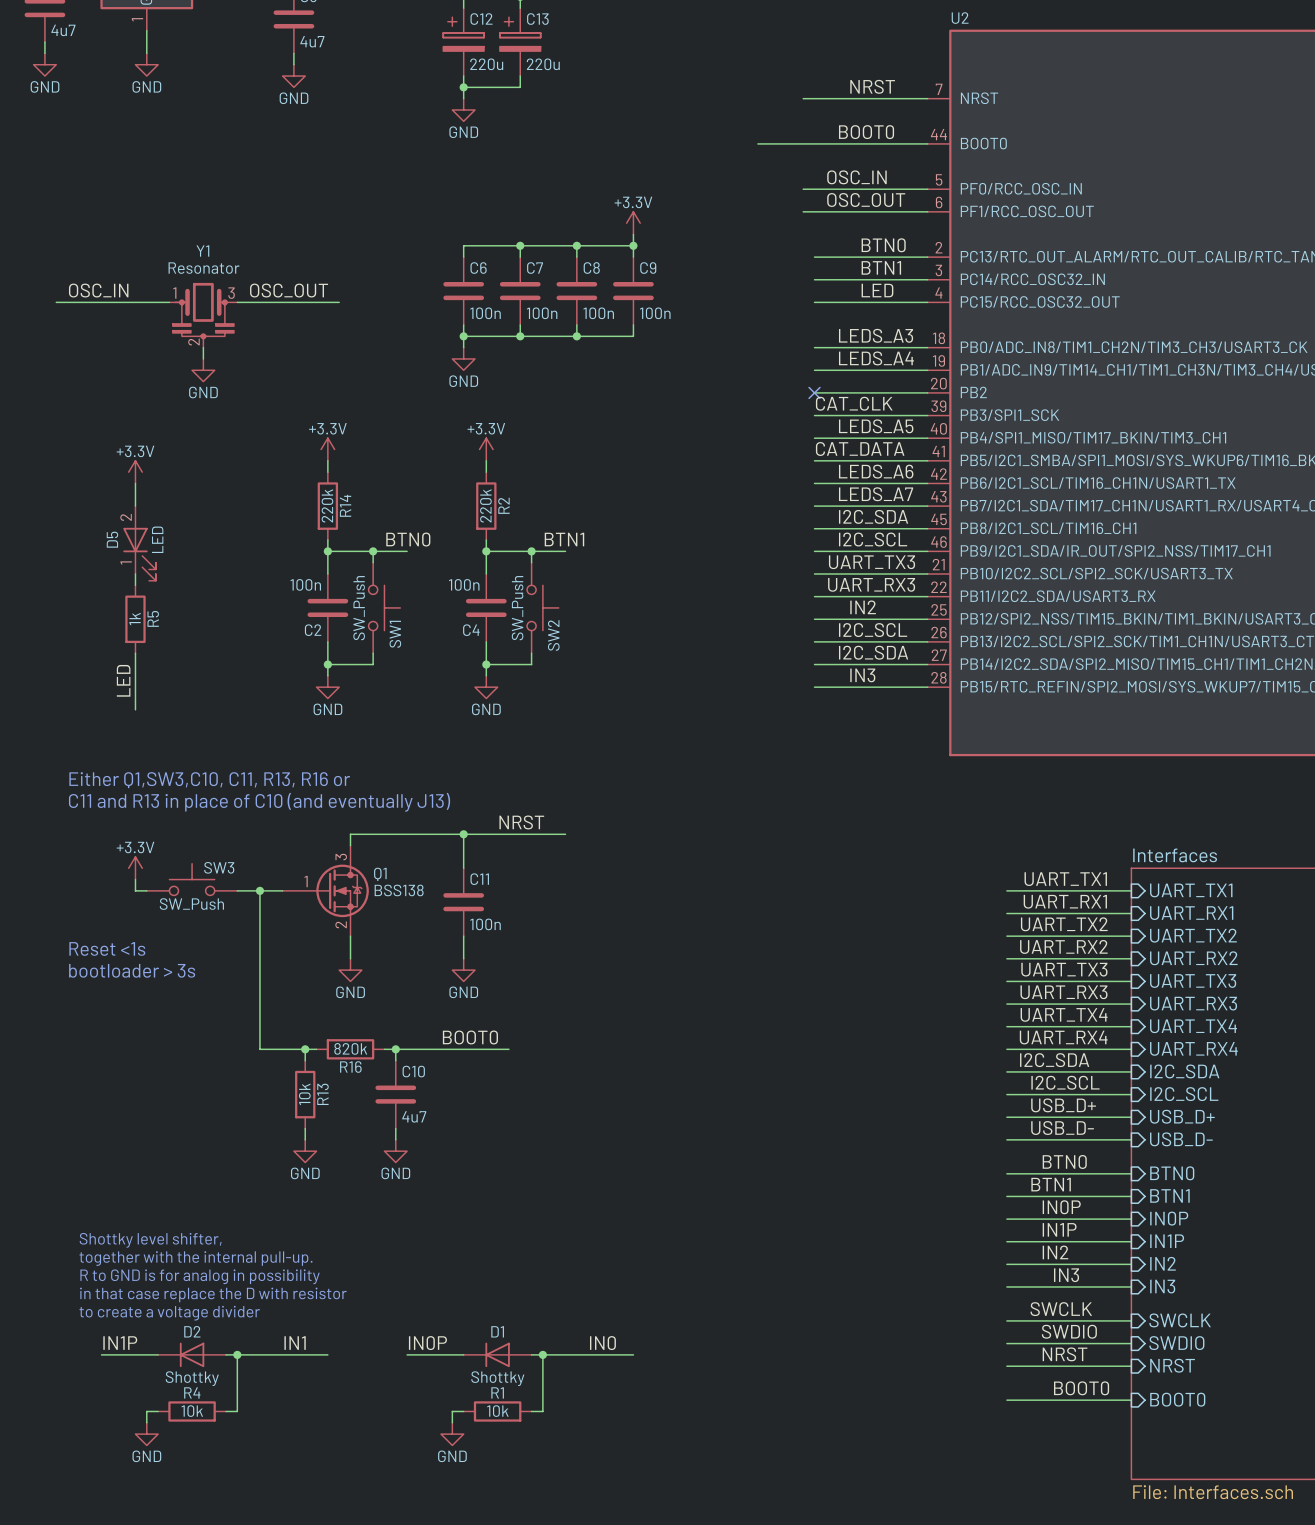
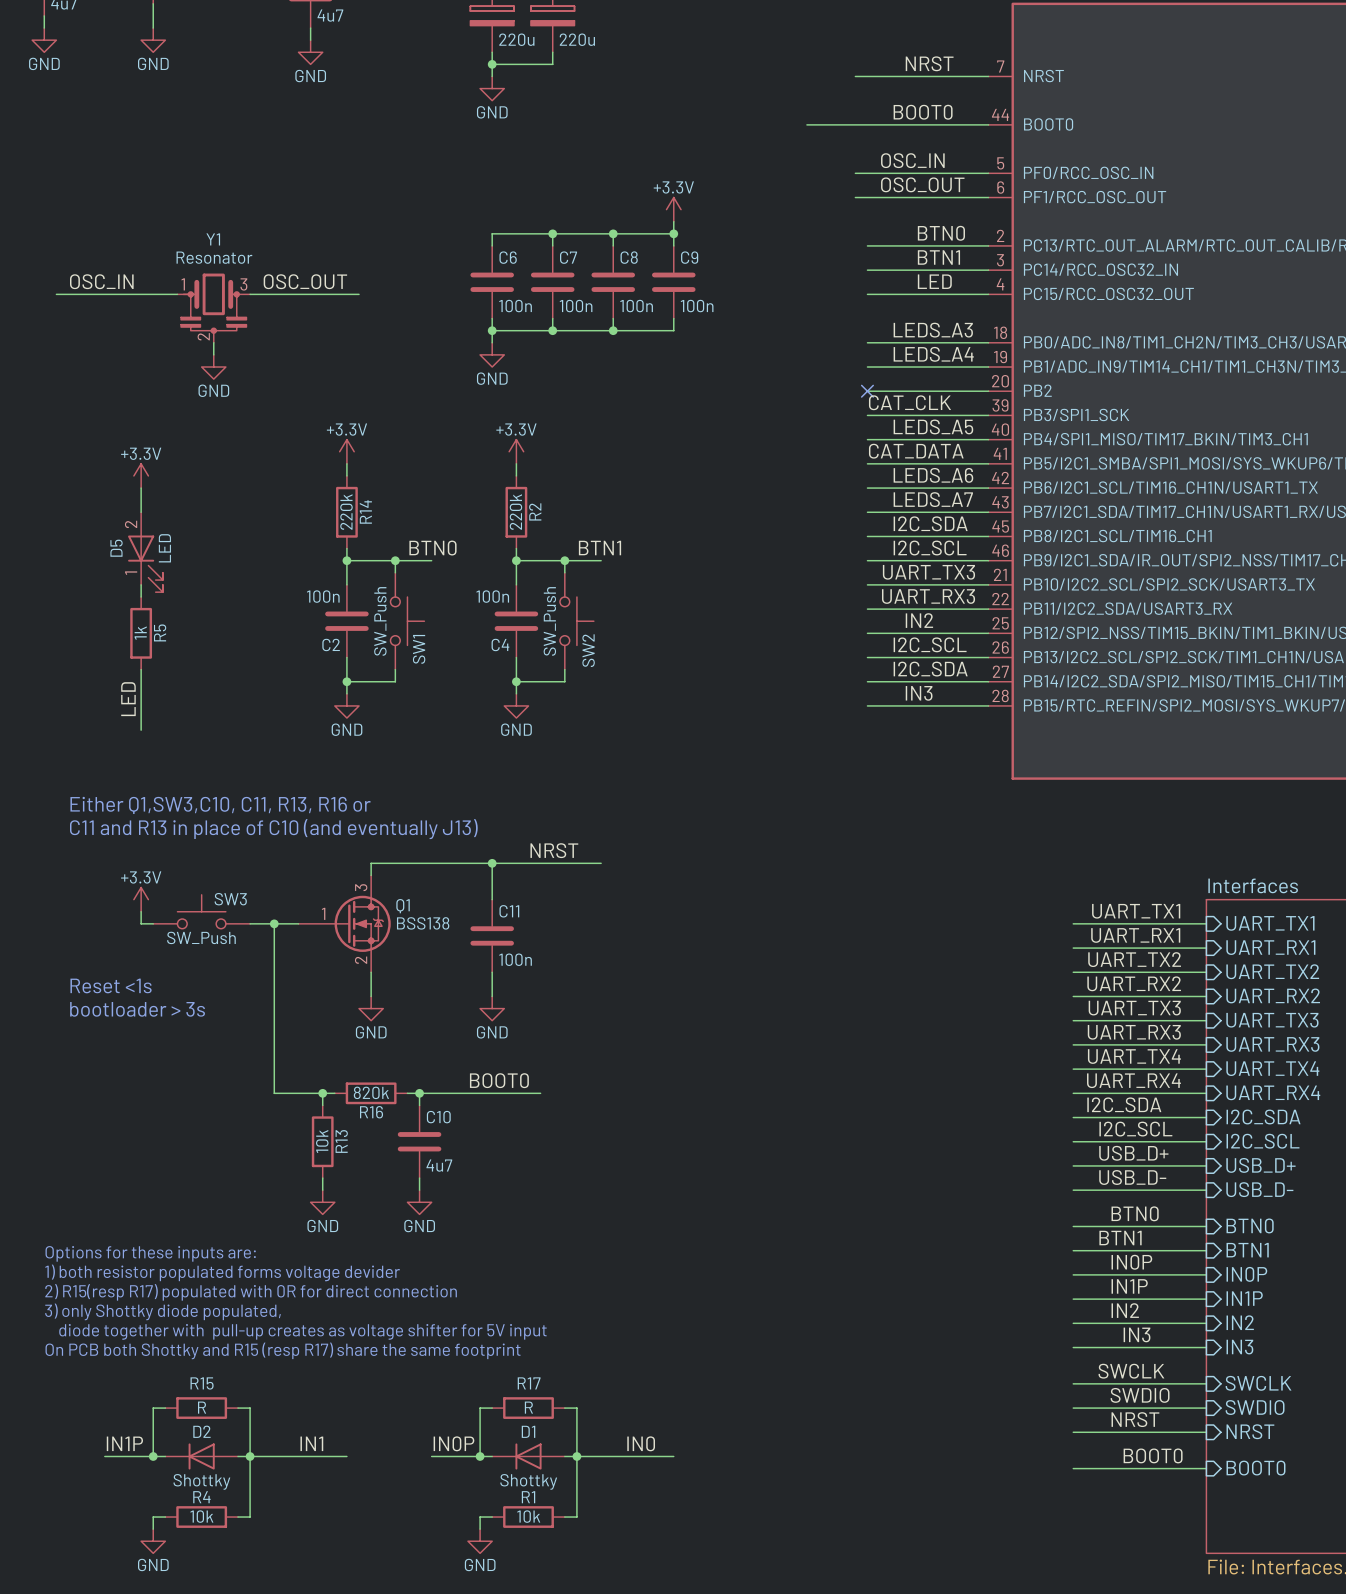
text: none -> Options for these inputs are: (150, 1253)
text: none -> 1) both resistor populated forms voltage devider (222, 1272)
text: none -> 2) R15(resp R17) populated with 0R for direct connection (251, 1292)
text: Shottky level shifter, (150, 1240) -> none
text: none -> 3) only Shottky diode populated, (163, 1311)
text: together with the internal pull-up. (195, 1258) -> none
text: none -> diode together with pull-up creates as voltage shifter for 5V input (302, 1331)
text: R to GND is for analog in possibility (200, 1276) -> none
text: none -> On PCB both Shottky and R15 (resp R17) share the same footprint (283, 1350)
text: in that case replace the D with resistor (213, 1294) -> none
text: to create a voltage divider (169, 1313) -> none
label position: IN1P (120, 1343) -> IN1P (124, 1443)
wire: none -> (165, 1408) (153, 1408) (153, 1456)
R15: none -> R (201, 1408)
wire: none -> (237, 1408) (250, 1408) (250, 1420)
label position: IN1 (295, 1343) -> IN1 (311, 1443)
label position: IN0P (427, 1343) -> IN0P (453, 1443)
wire: none -> (492, 1408) (480, 1408) (480, 1456)
R17: none -> R (528, 1408)
wire: none -> (564, 1408) (576, 1408) (576, 1420)
label position: IN0 (602, 1343) -> IN0 (641, 1443)
wire: (101, 1354) (158, 1354) -> (104, 1456) (165, 1456)
D2 position: (192, 1354) -> (201, 1456)
wire: (226, 1354) (327, 1354) -> (237, 1456) (346, 1456)
junction position: (237, 1354) -> (250, 1456)
wire: (407, 1354) (463, 1354) -> (431, 1456) (492, 1456)
D1 position: (497, 1354) -> (528, 1456)
wire: (531, 1354) (633, 1354) -> (564, 1456) (673, 1456)
junction position: (542, 1354) -> (576, 1456)
junction: none -> (153, 1456)
junction: none -> (480, 1456)
wire: (158, 1411) (146, 1411) (146, 1422) -> (165, 1517) (153, 1517) (153, 1529)
R4 position: (192, 1411) -> (201, 1517)
wire: (226, 1411) (237, 1411) -> (237, 1517) (250, 1517) (250, 1480)
wire: (463, 1411) (452, 1411) (452, 1422) -> (492, 1517) (480, 1517) (480, 1529)
R1 position: (497, 1411) -> (528, 1517)
wire: (531, 1411) (542, 1411) -> (564, 1517) (576, 1517) (576, 1480)
power symbol position: GND (146, 1434) -> GND (153, 1541)
power symbol position: GND (452, 1434) -> GND (480, 1541)

